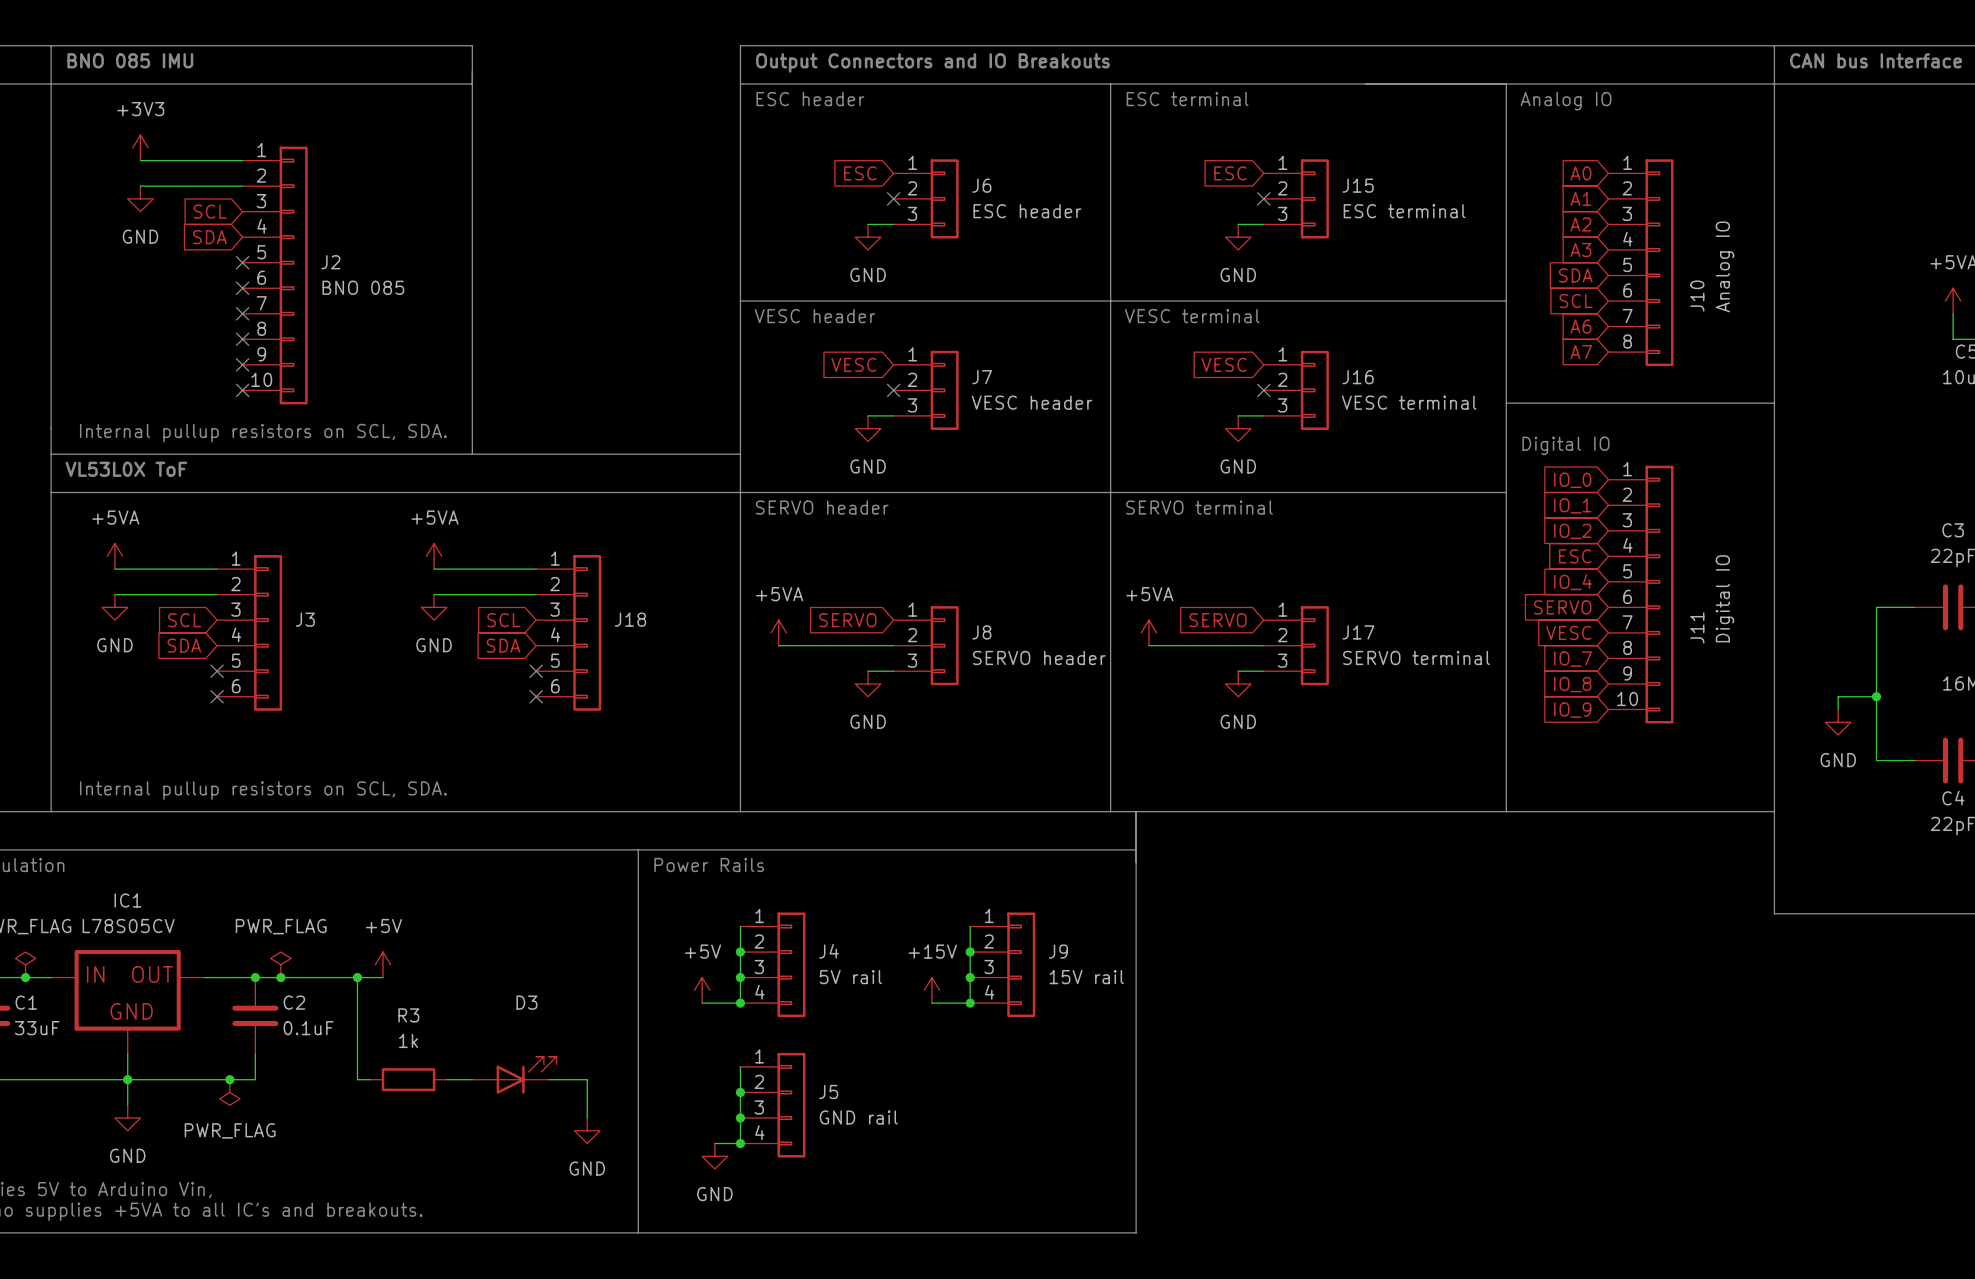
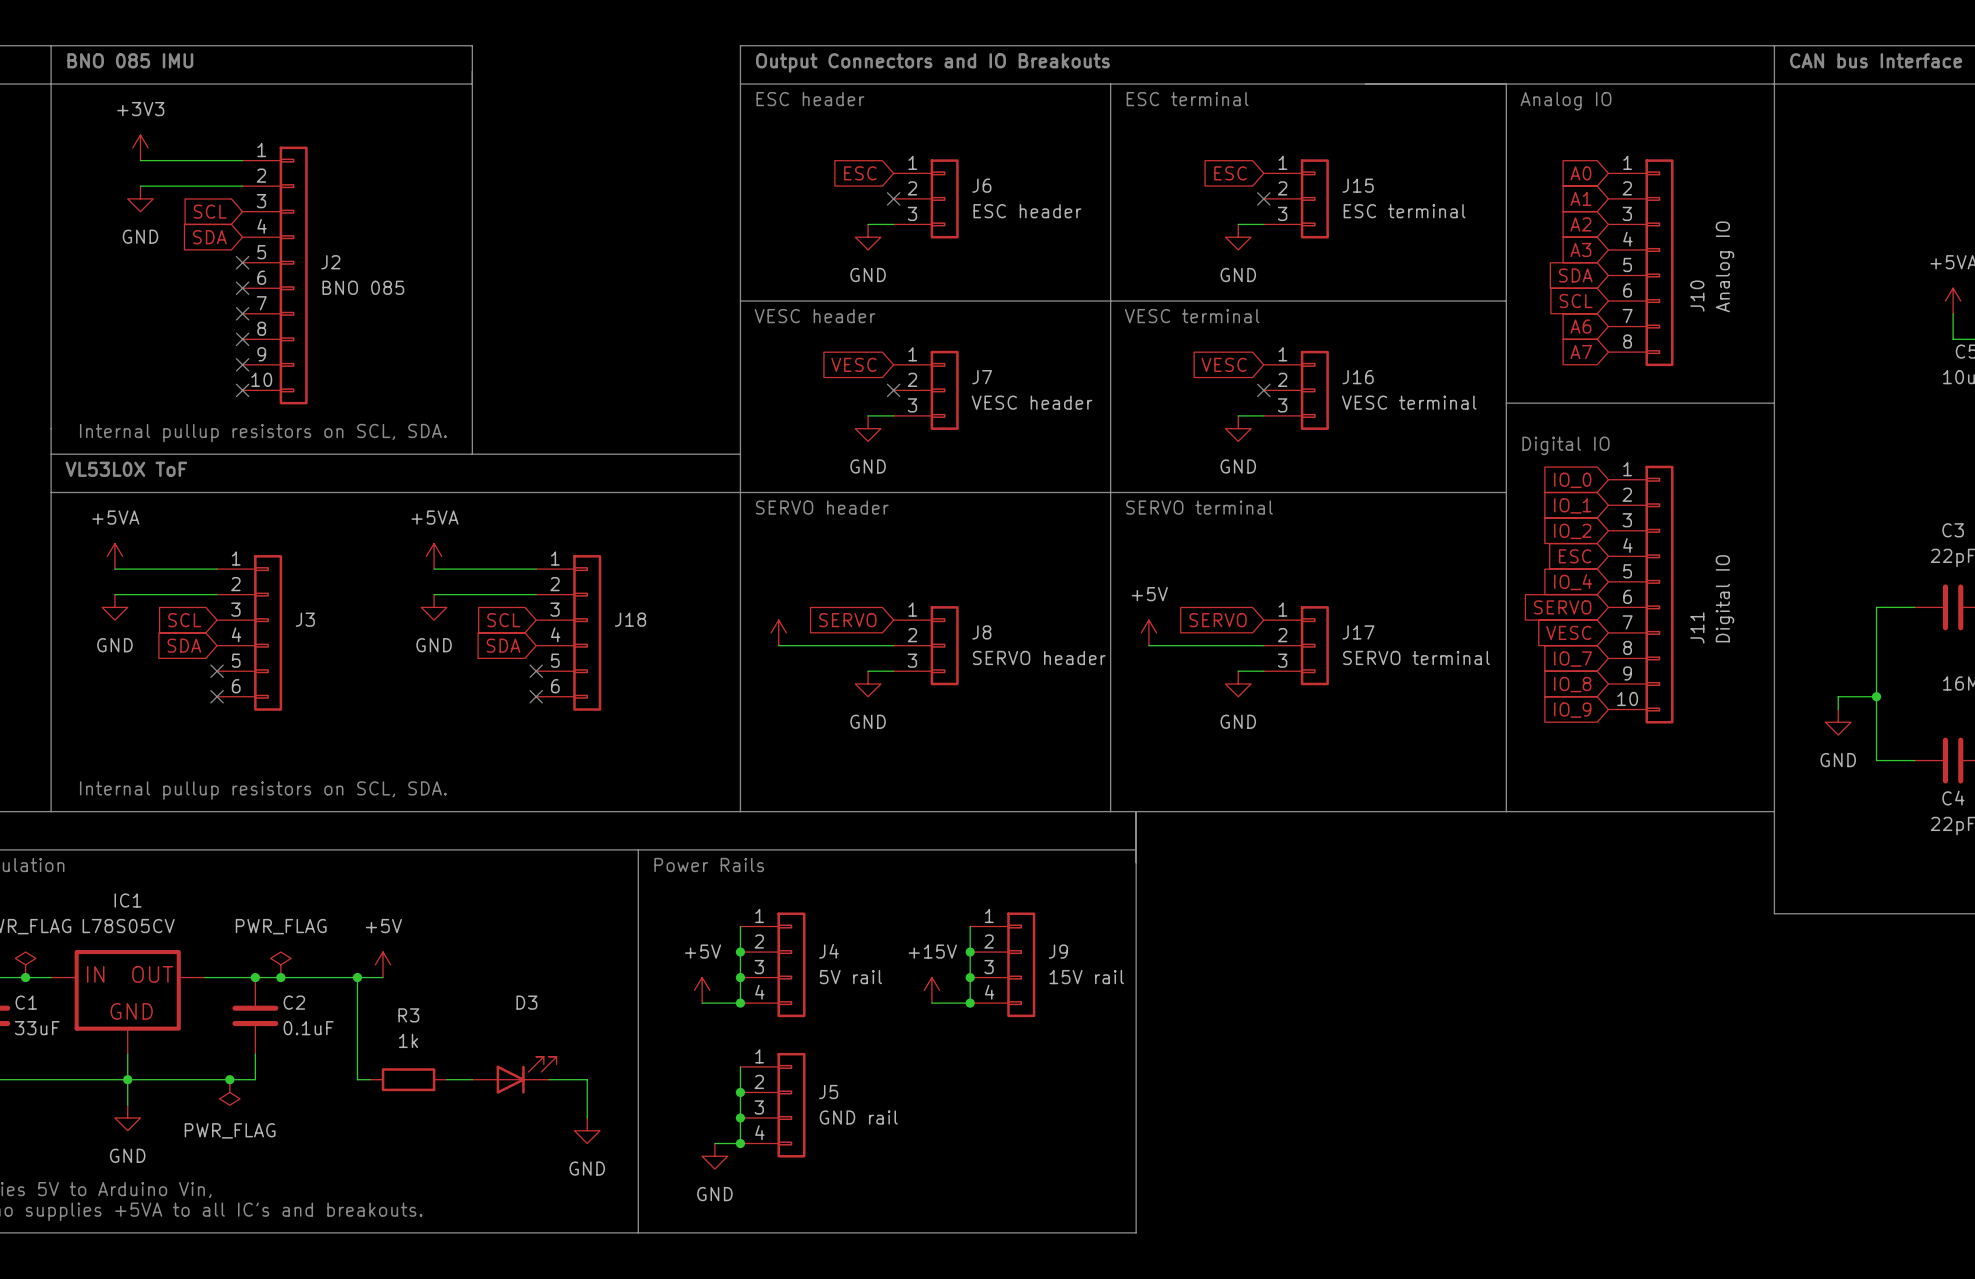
power symbol text: +5VA (779, 594) -> none
power symbol: +5VA (1148, 632) -> +5V (1148, 632)

